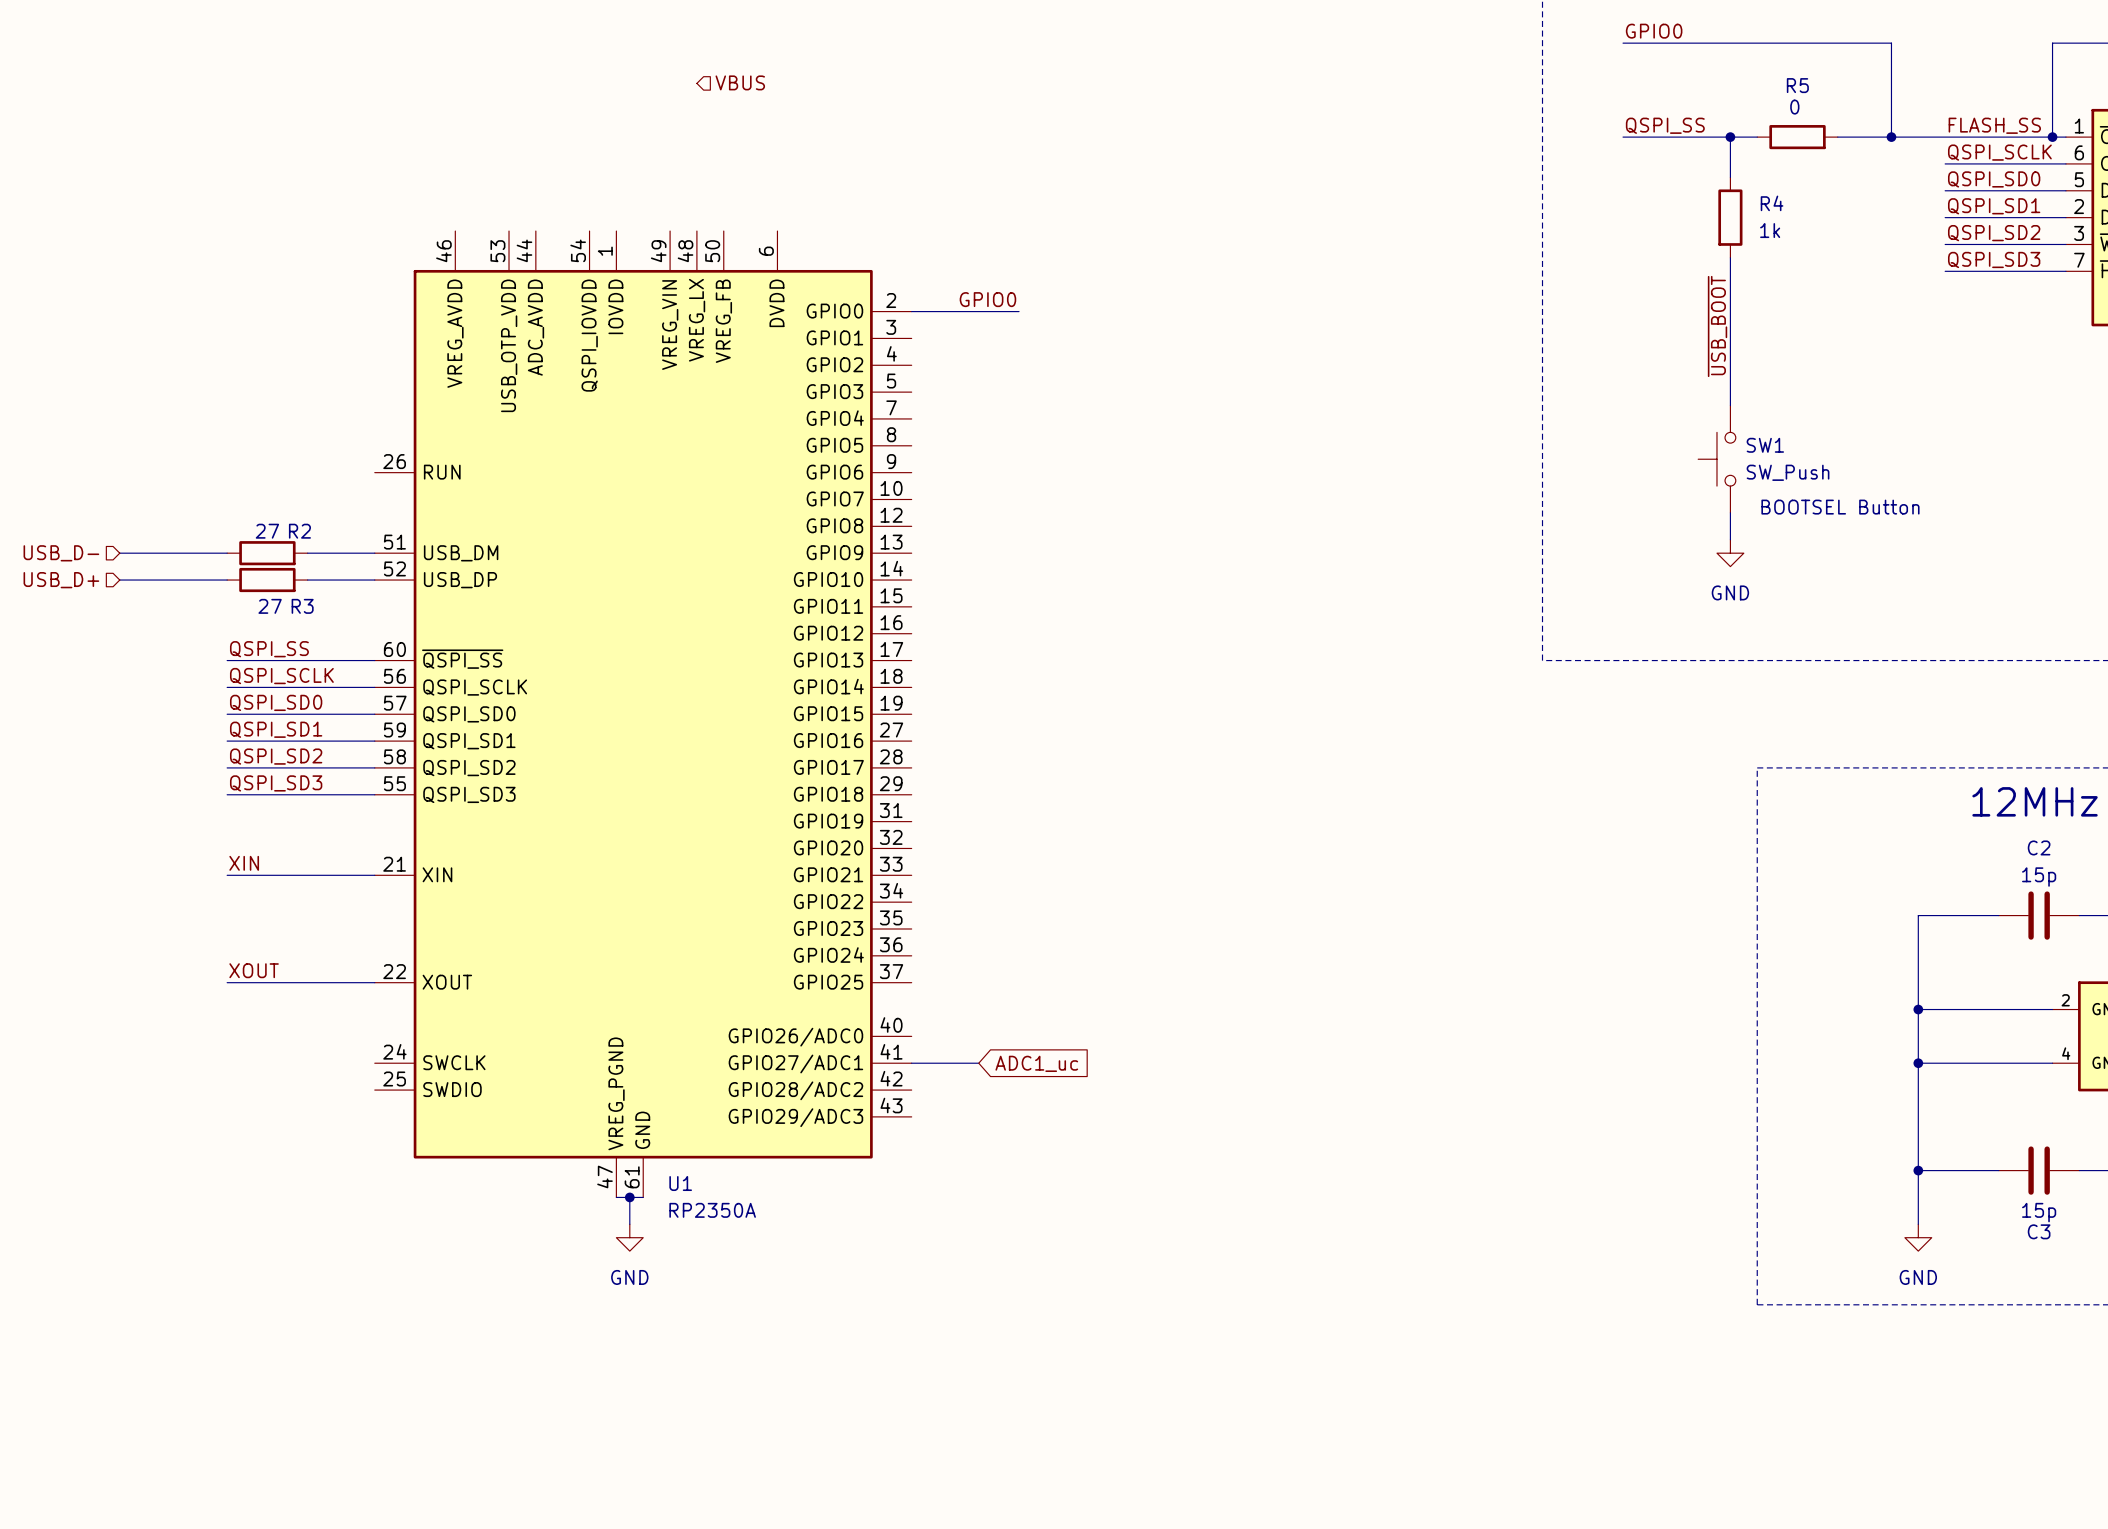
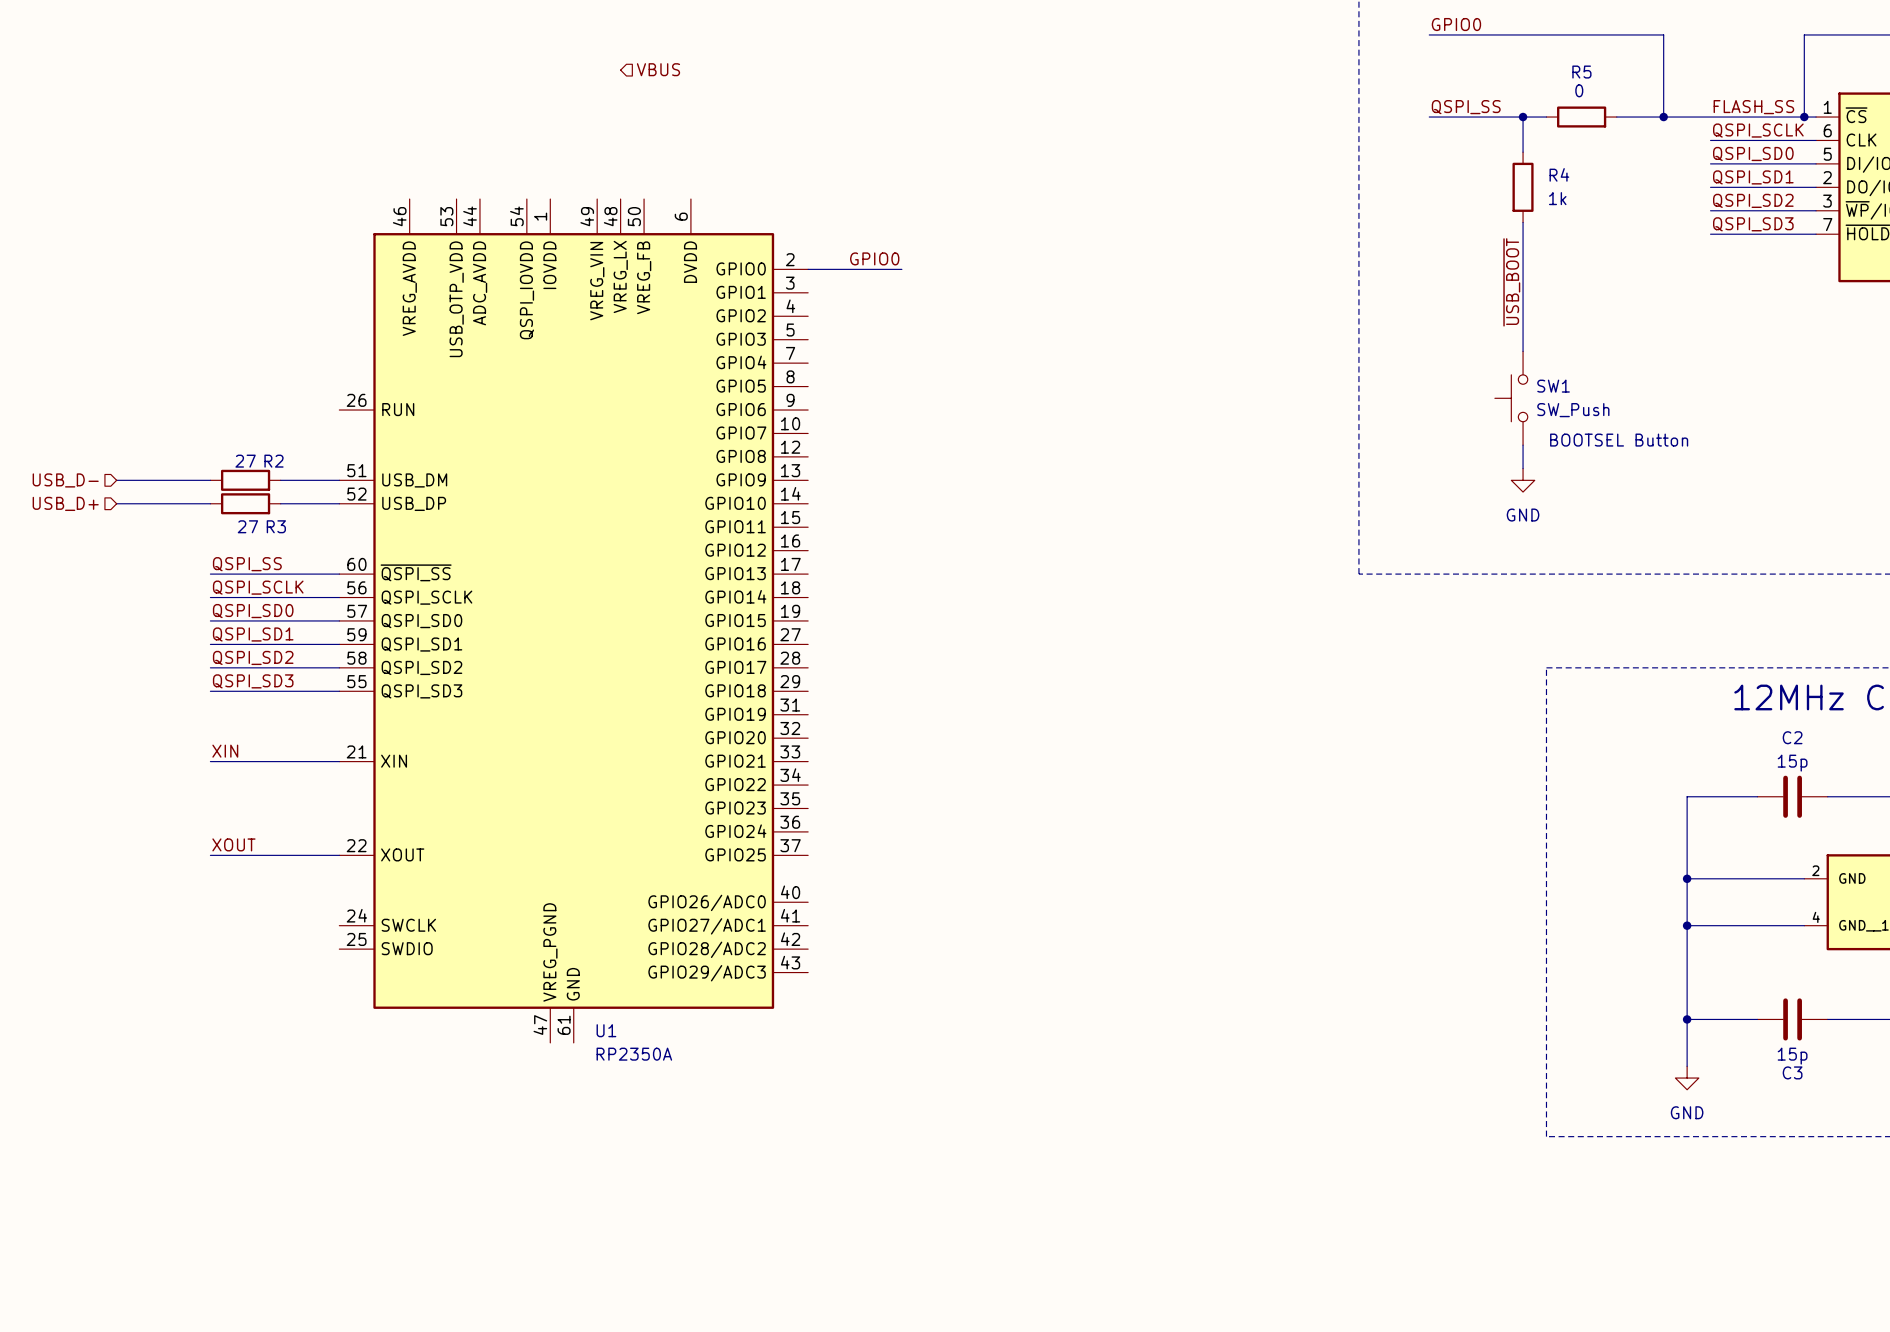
wire: (911, 1063) (978, 1063) -> none
global label: ADC1_uc (1036, 1063) -> none
wire: (616, 1197) (643, 1197) -> none
wire: (629, 1197) (629, 1224) -> none
junction: (629, 1197) -> none
power symbol: GND (629, 1237) -> none

